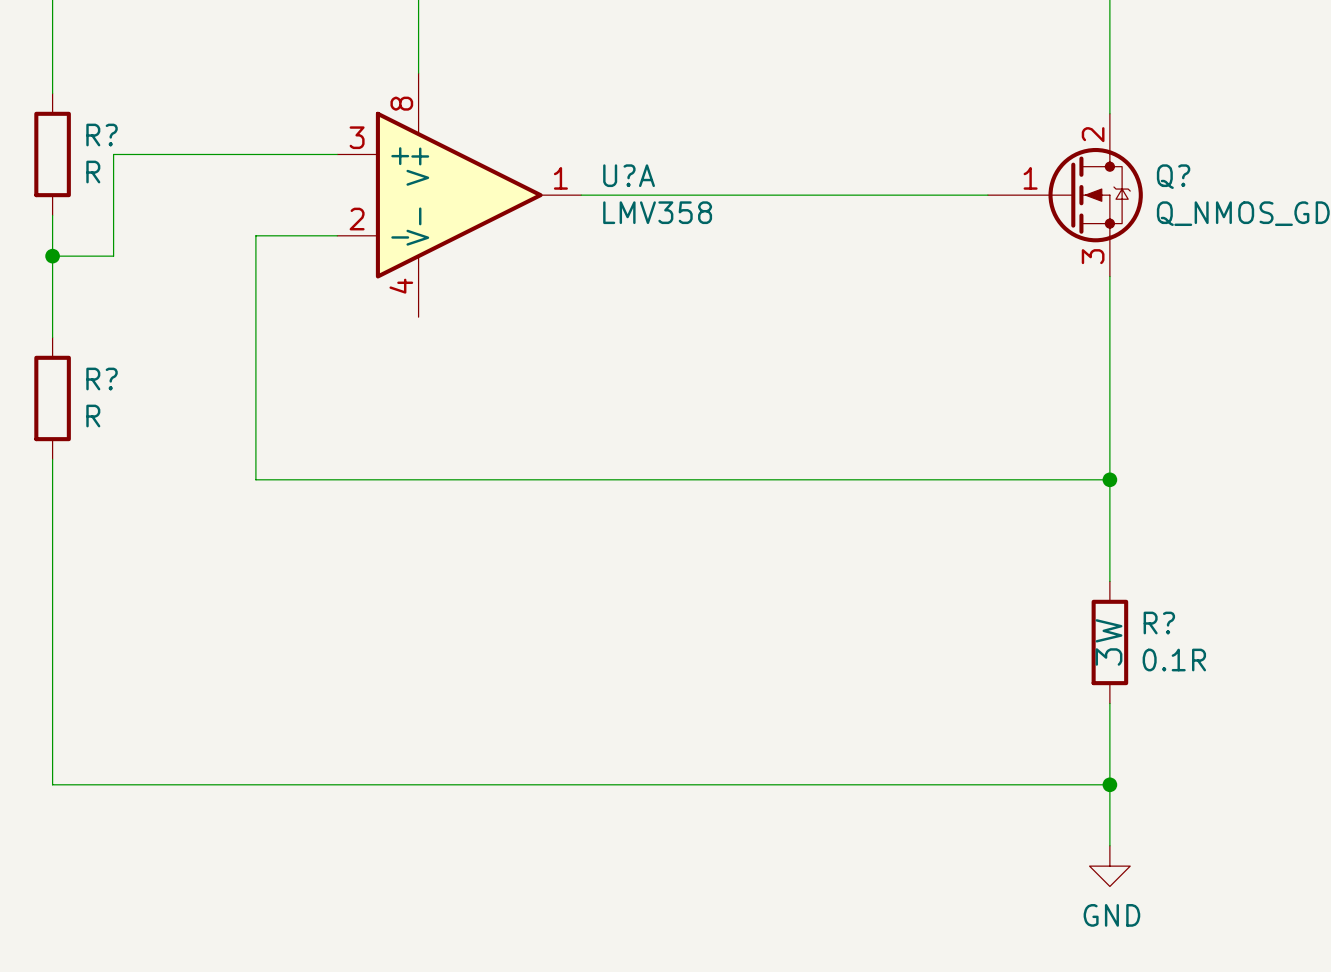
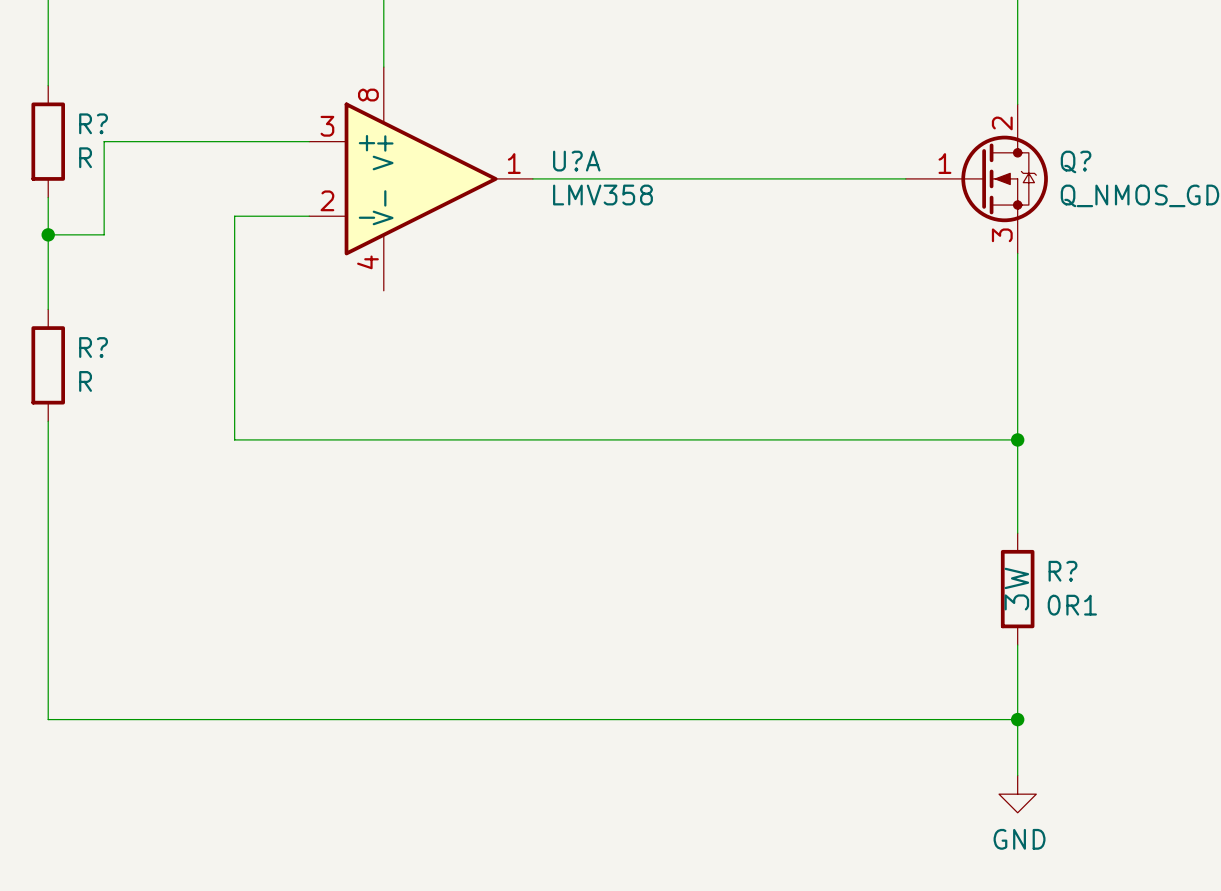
R? value: 0.1R (1174, 660) -> 0R1 (1072, 605)

